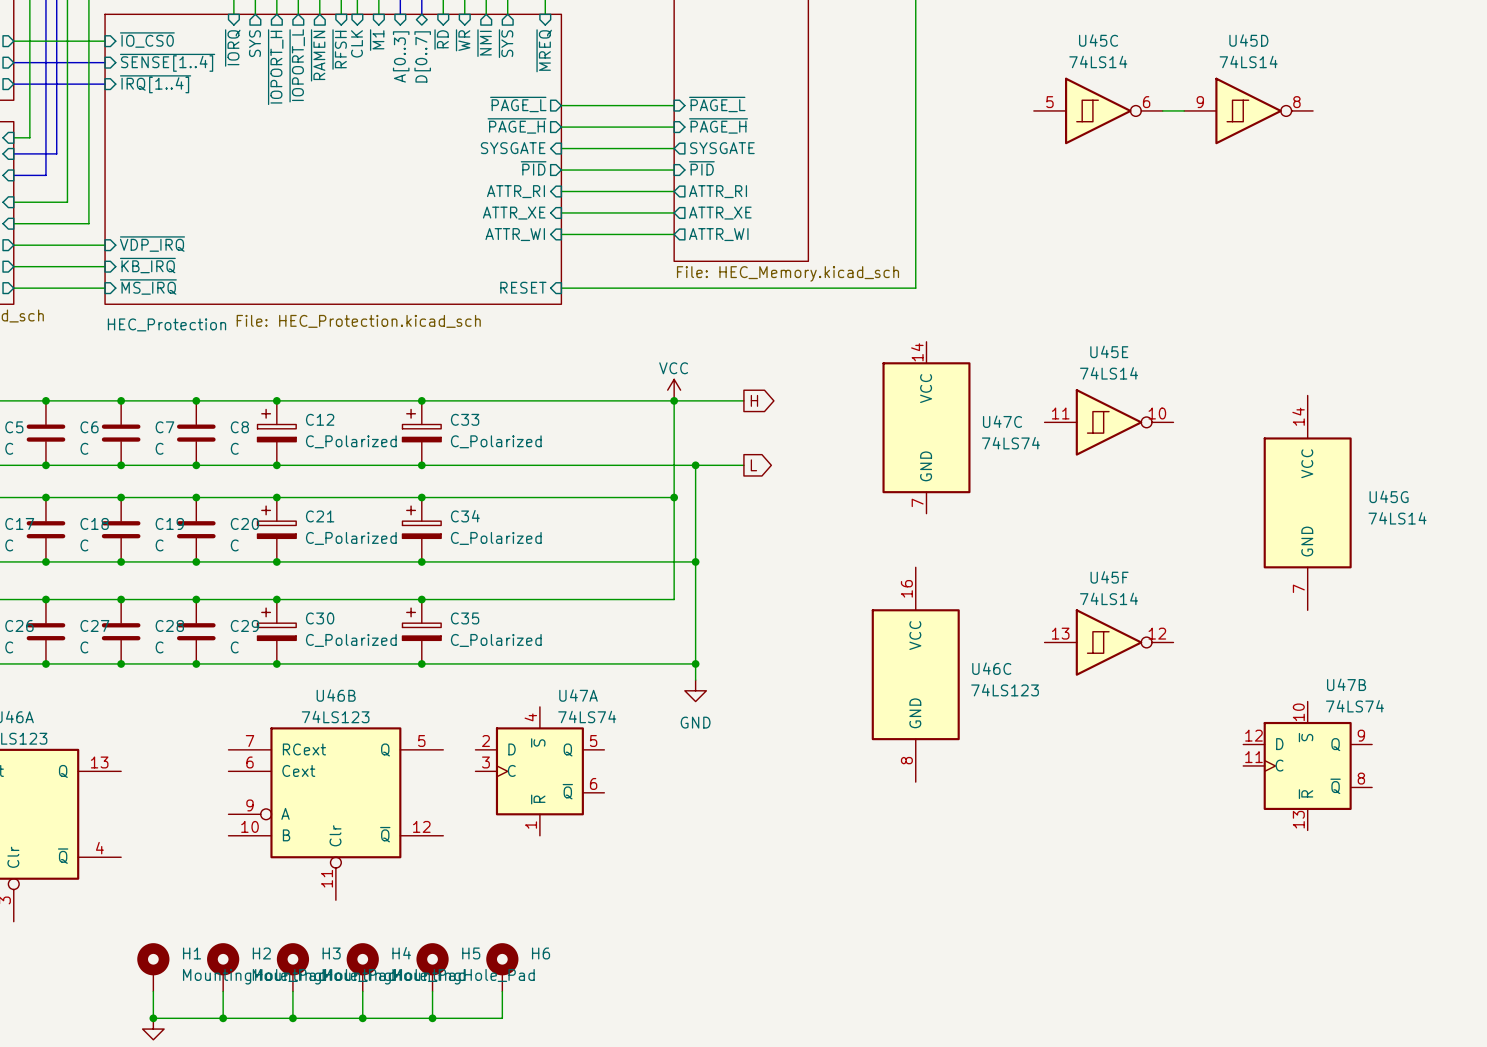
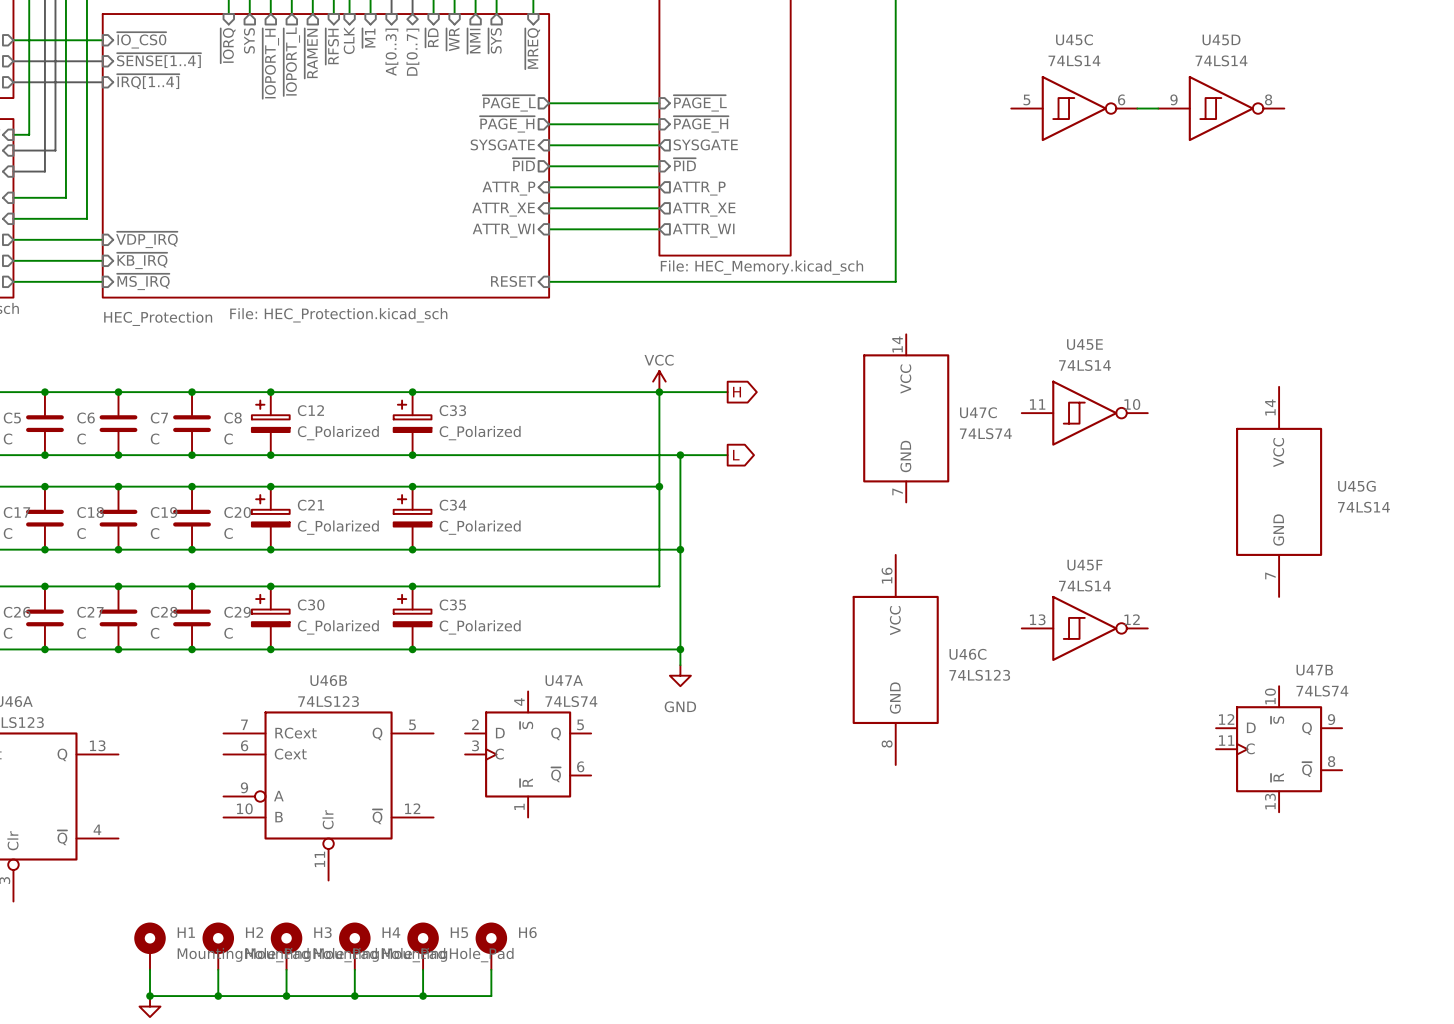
sheet pin: ATTR_RI (515, 191) -> ATTR_P (508, 188)
sheet pin: ATTR_RI (718, 191) -> ATTR_P (699, 188)

